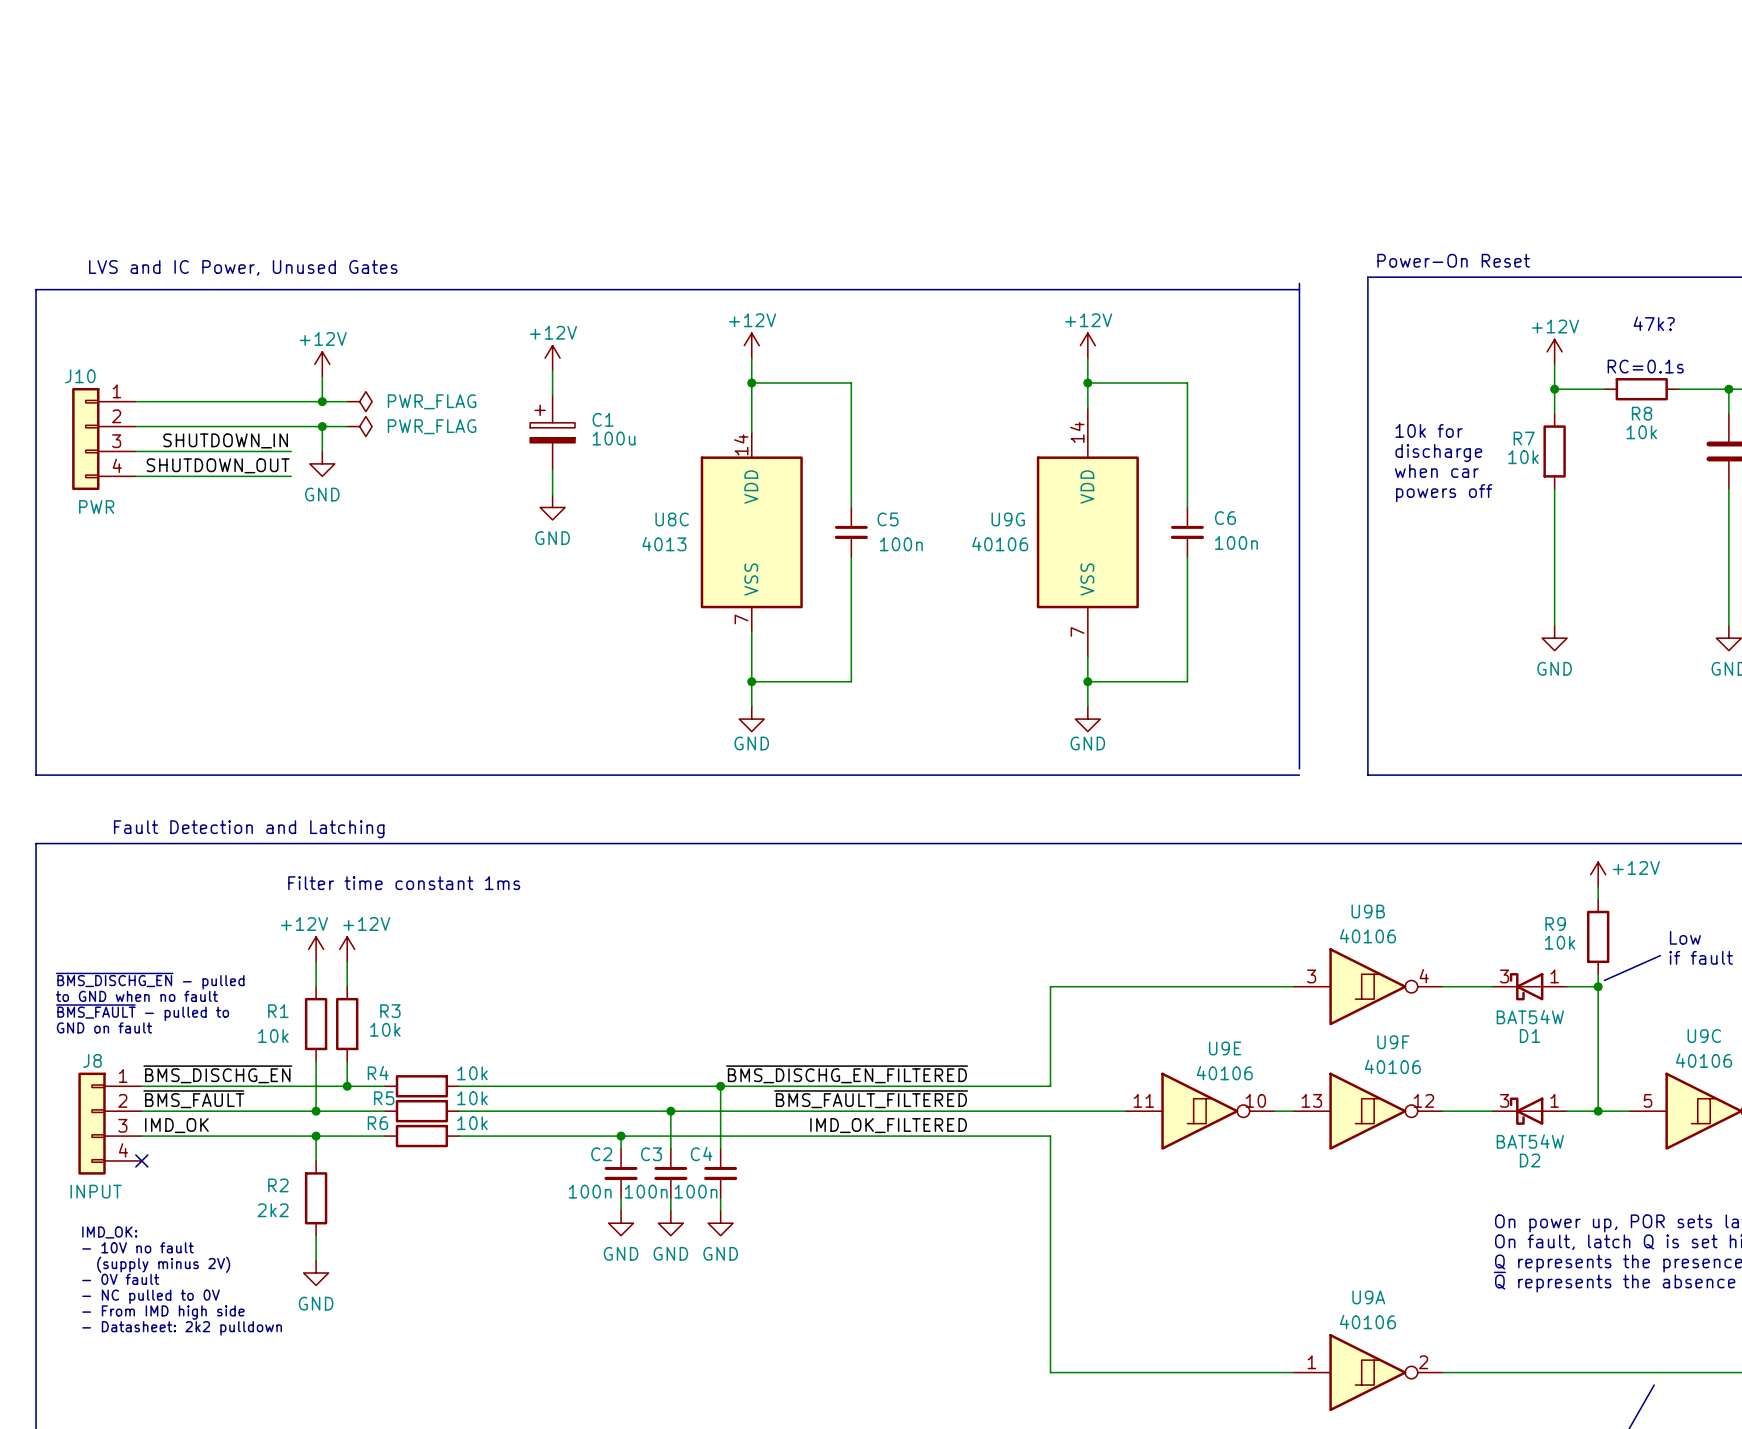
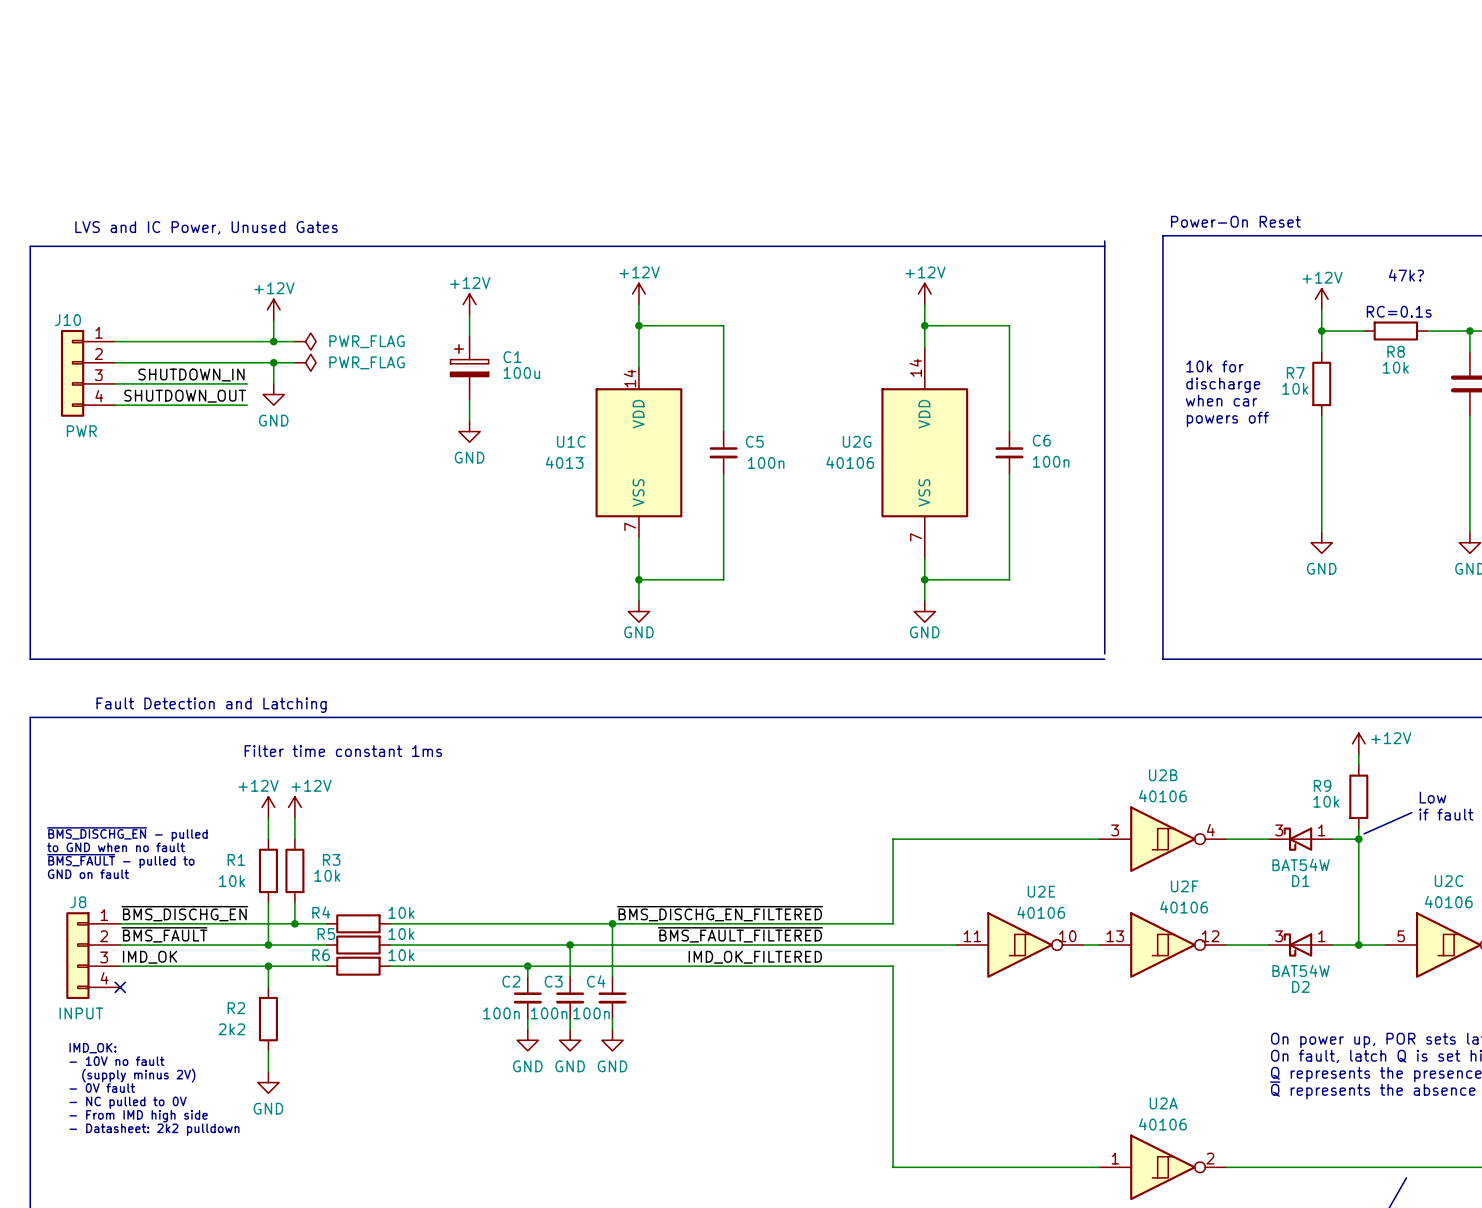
U8C name: U8C (672, 519) -> U1C (571, 441)
U9G name: U9G (1008, 519) -> U2G (857, 441)
U9B name: U9B (1368, 911) -> U2B (1163, 775)
U9C name: U9C (1704, 1036) -> U2C (1449, 881)
U9F name: U9F (1393, 1042) -> U2F (1184, 886)
U9E name: U9E (1225, 1048) -> U2E (1041, 891)
U9A name: U9A (1368, 1297) -> U2A (1163, 1103)

